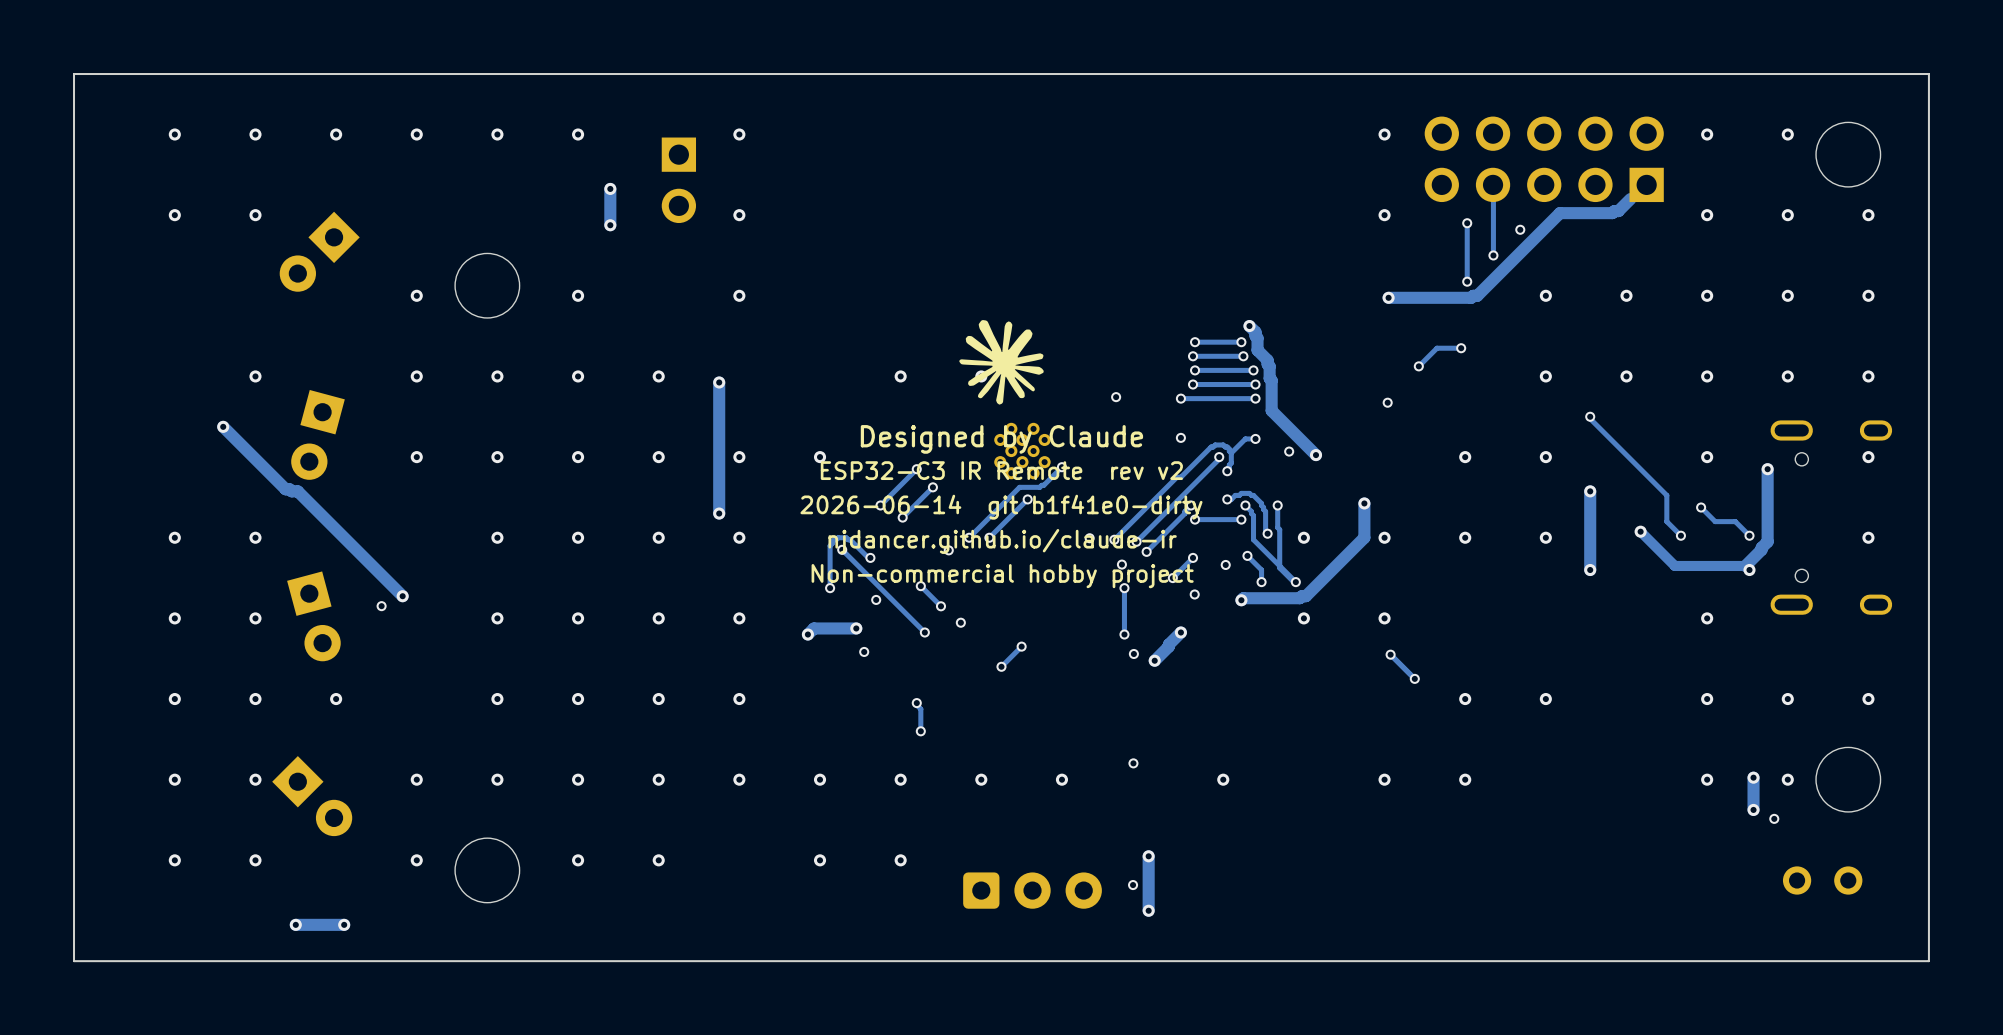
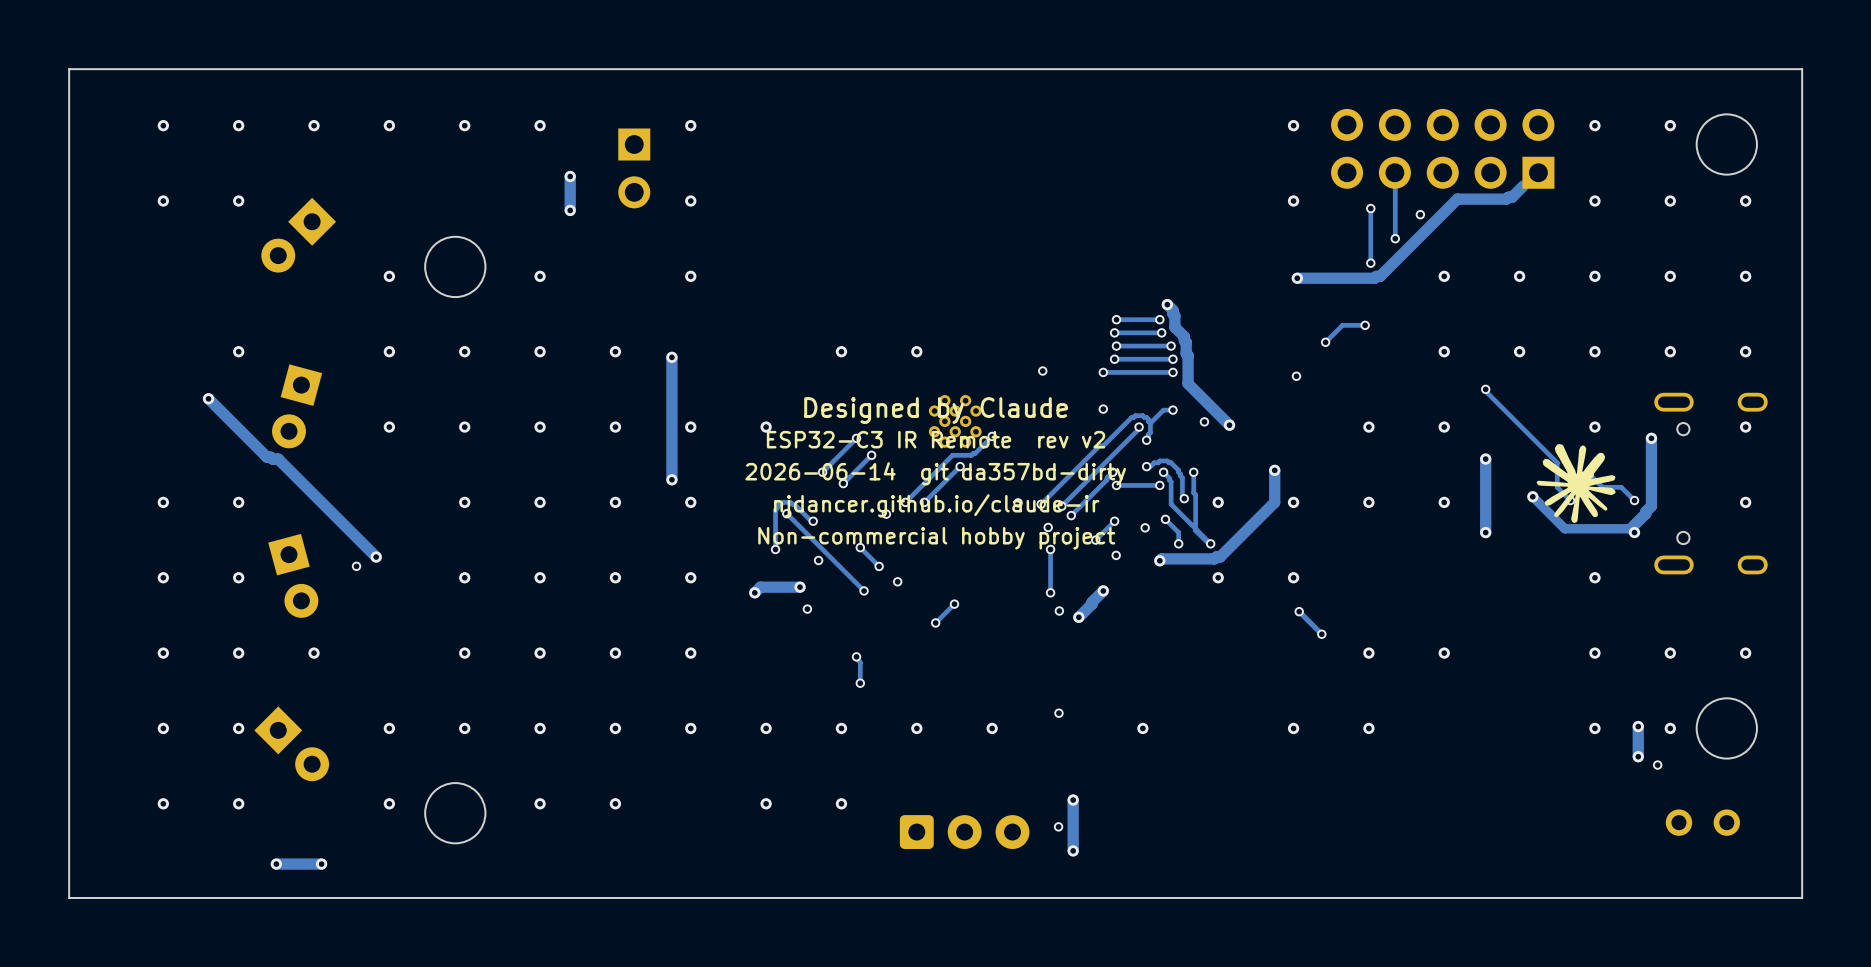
drawing: [959, 320, 1044, 405] -> none
drawing: none -> [1536, 444, 1616, 524]
text: 2026-06-14 git b1f41e0-dirty (1001, 507) -> 2026-06-14 git da357bd-dirty (935, 473)

